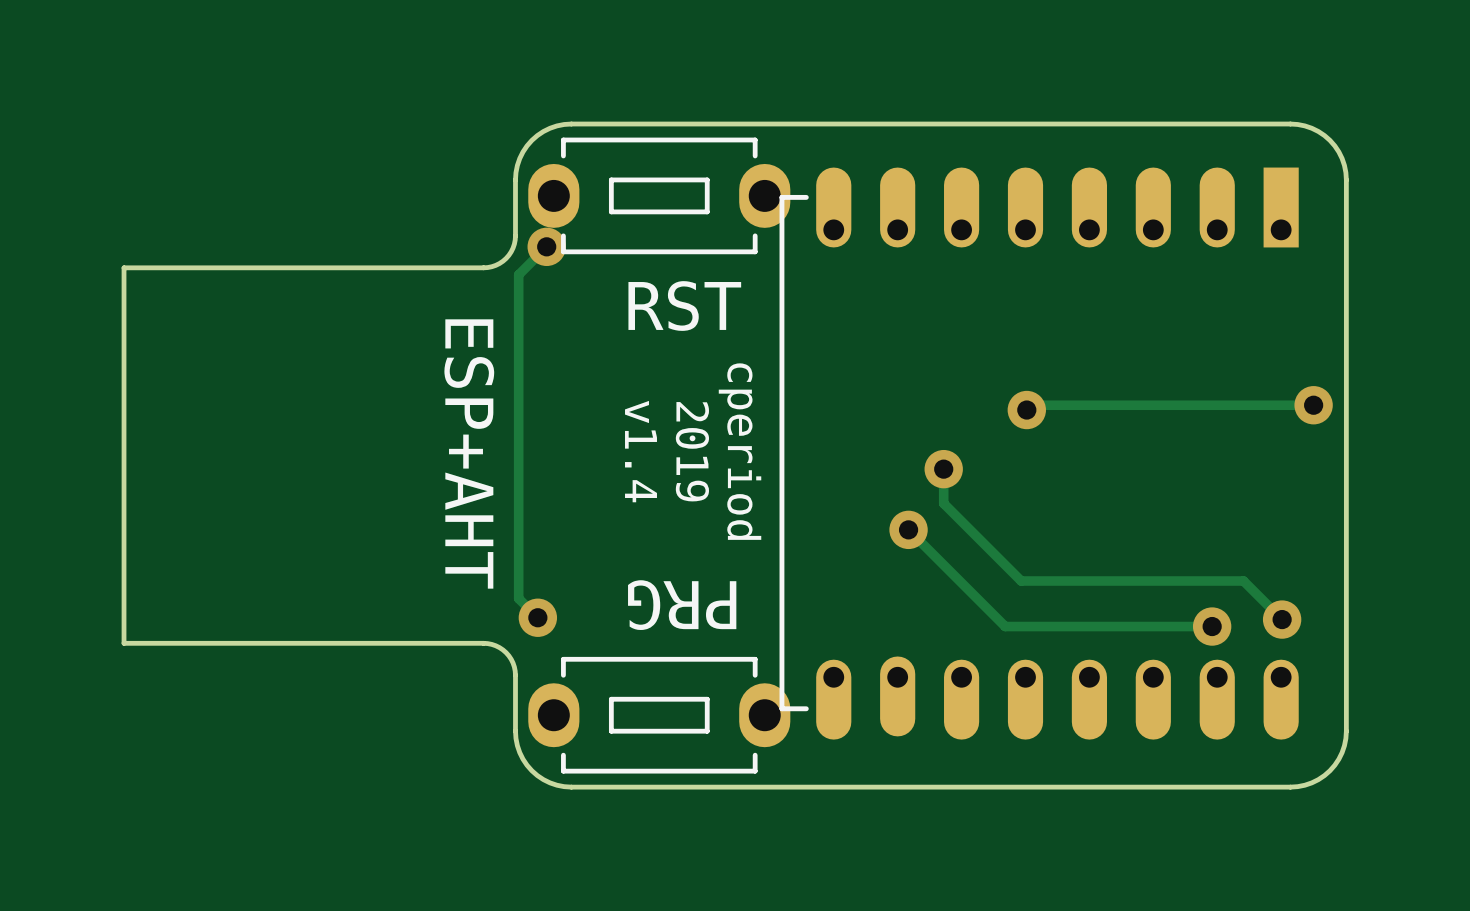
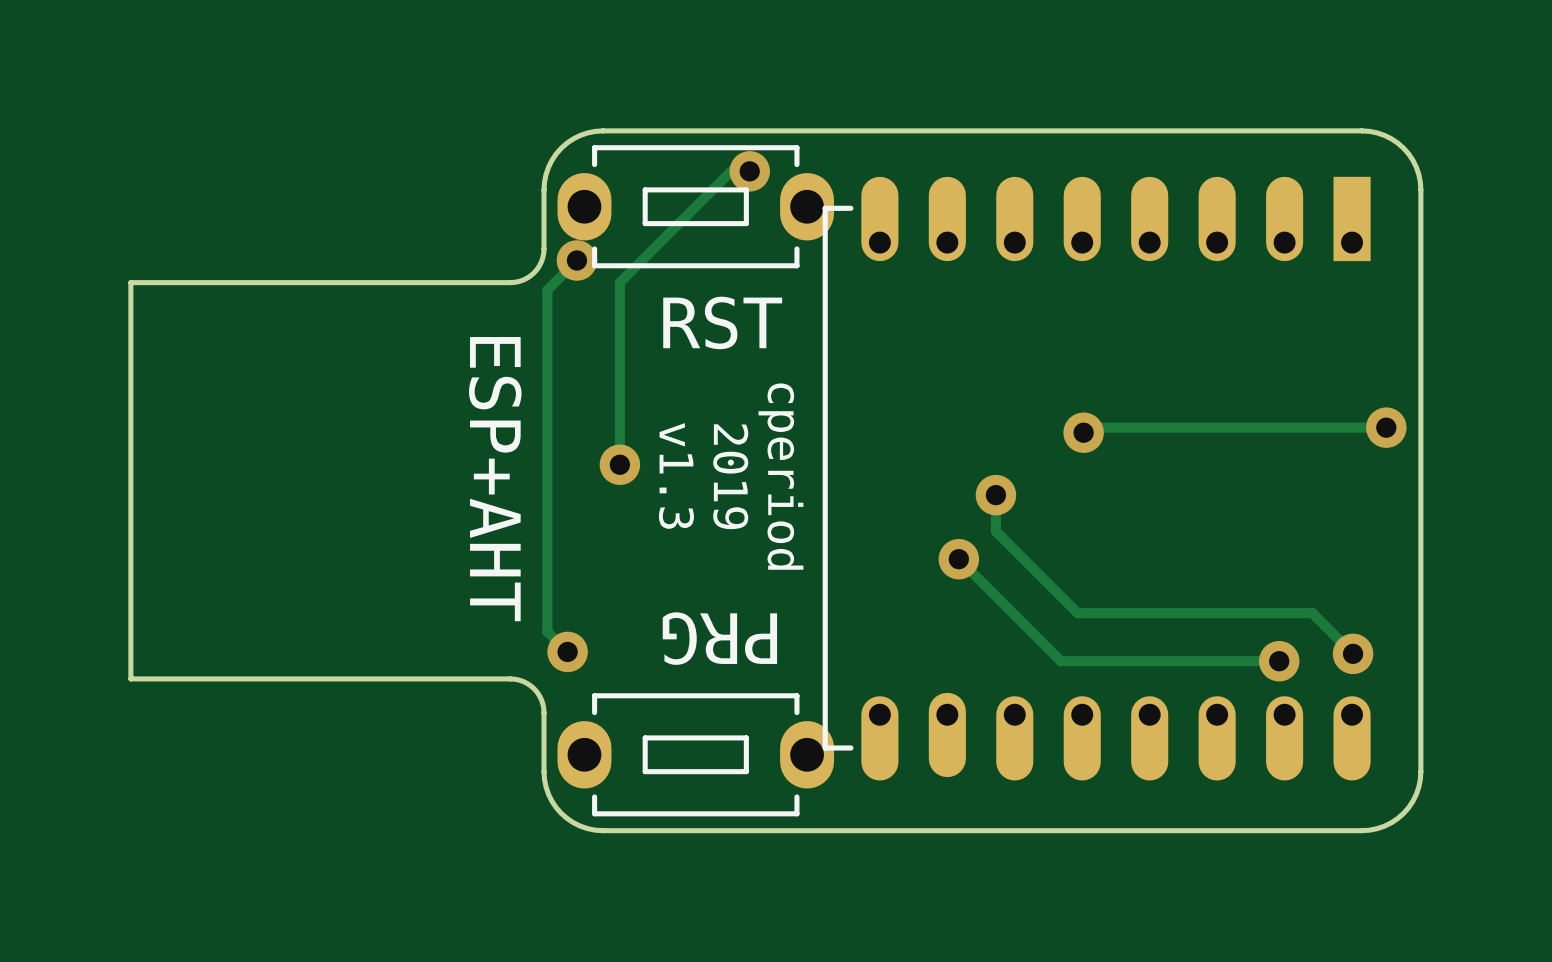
track: none -> (749, 171) (731, 171) (619, 282) (619, 464)
via: none -> (749, 171)
via: none -> (619, 464)
text: none -> v1.3 (676, 475)
text: v1.4 (641, 451) -> none

